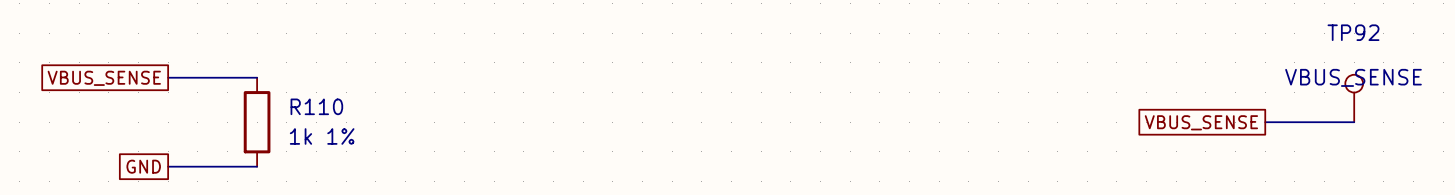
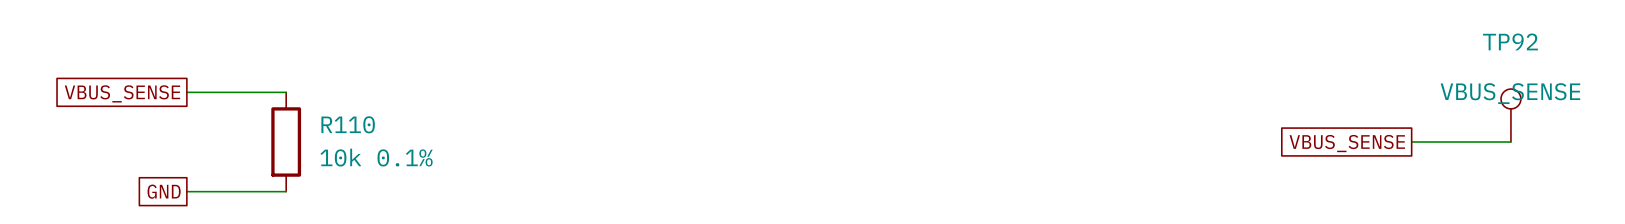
R110 value: 1k 1% (322, 136) -> 10k 0.1% (376, 157)

